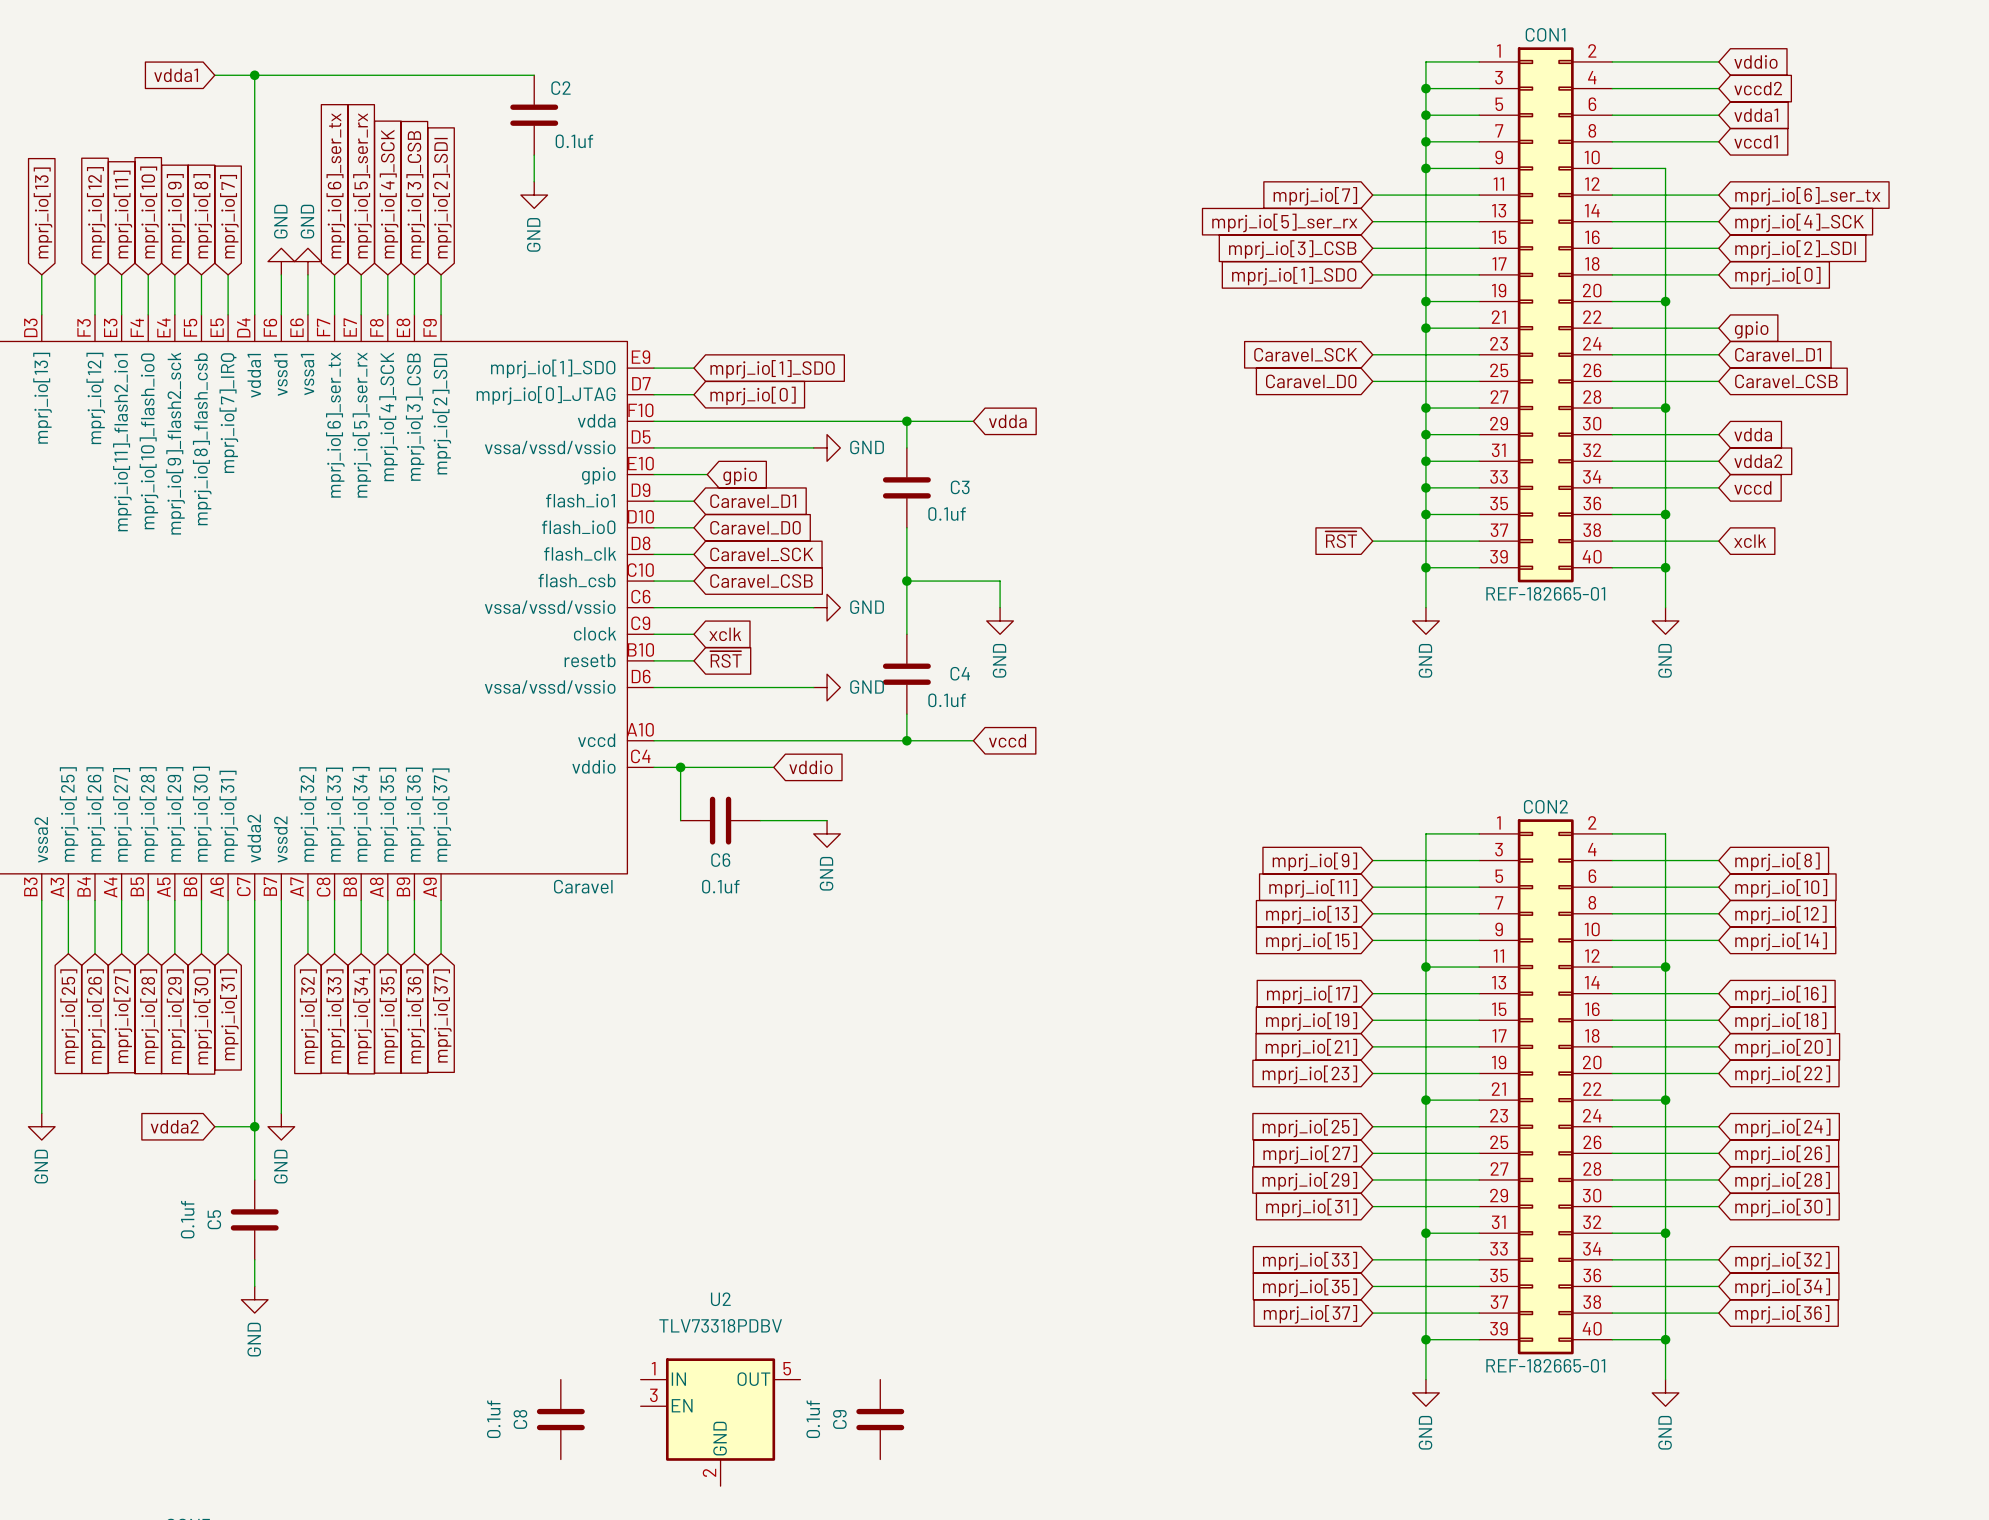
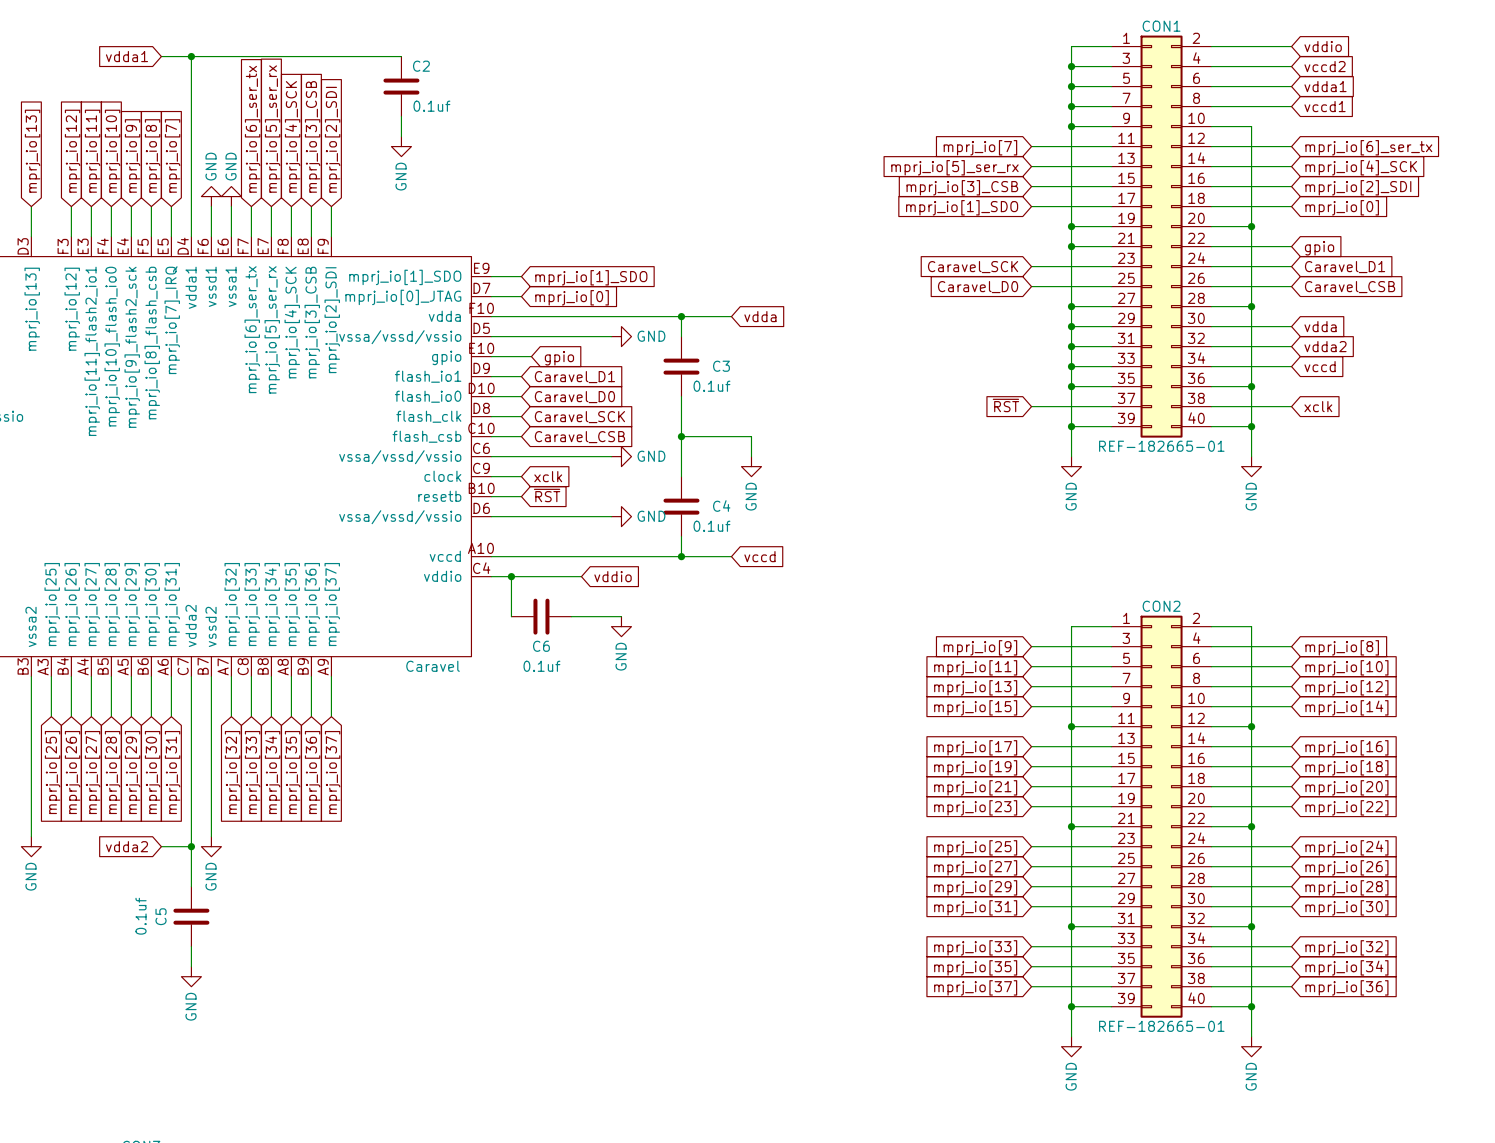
C8: 0.1uf (560, 1419) -> none
C9: 0.1uf (880, 1419) -> none
U2: TLV73318PDBV (720, 1422) -> none

